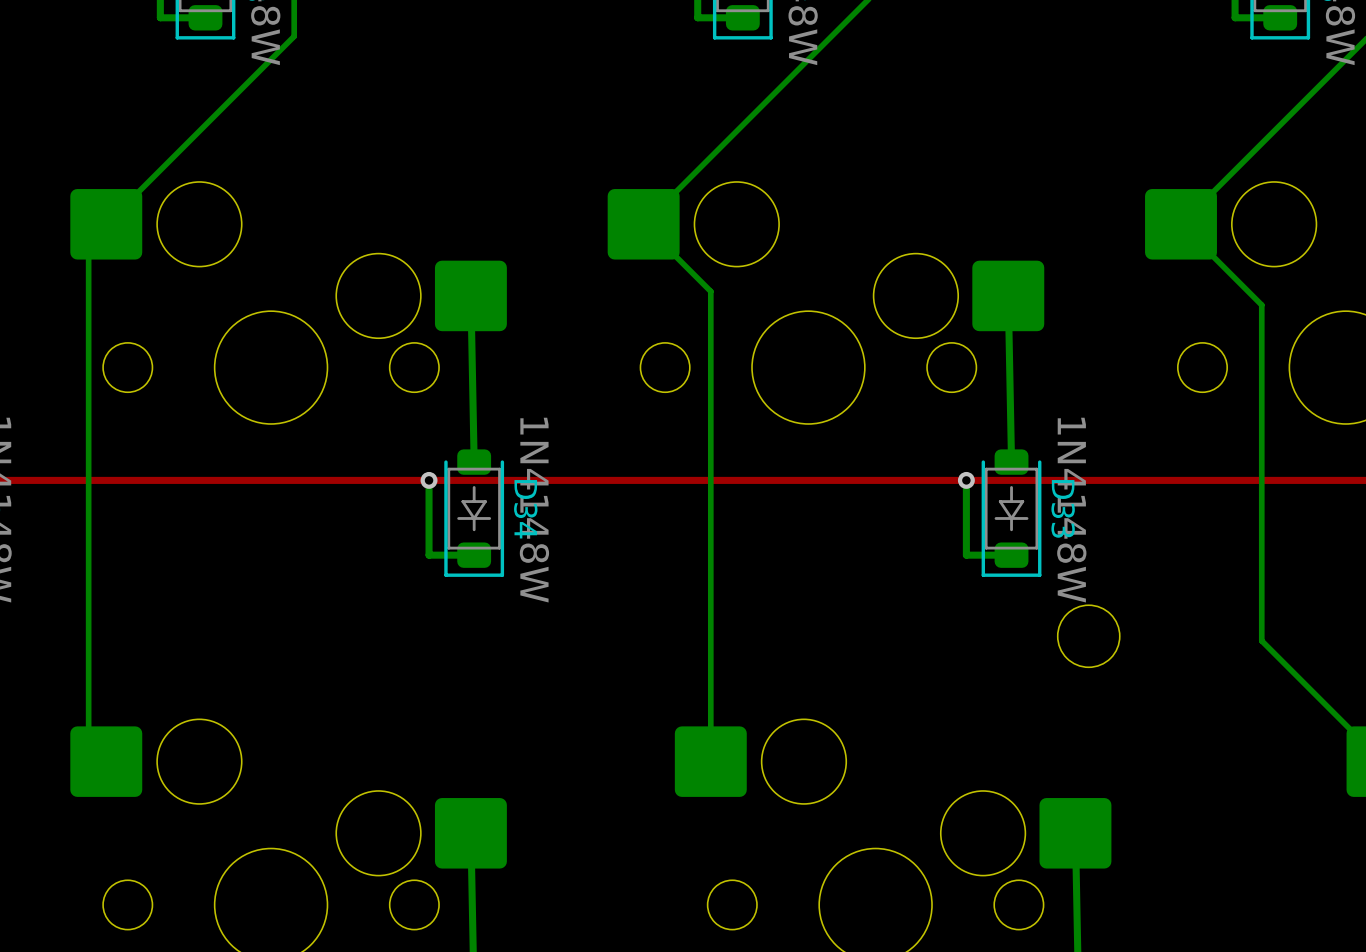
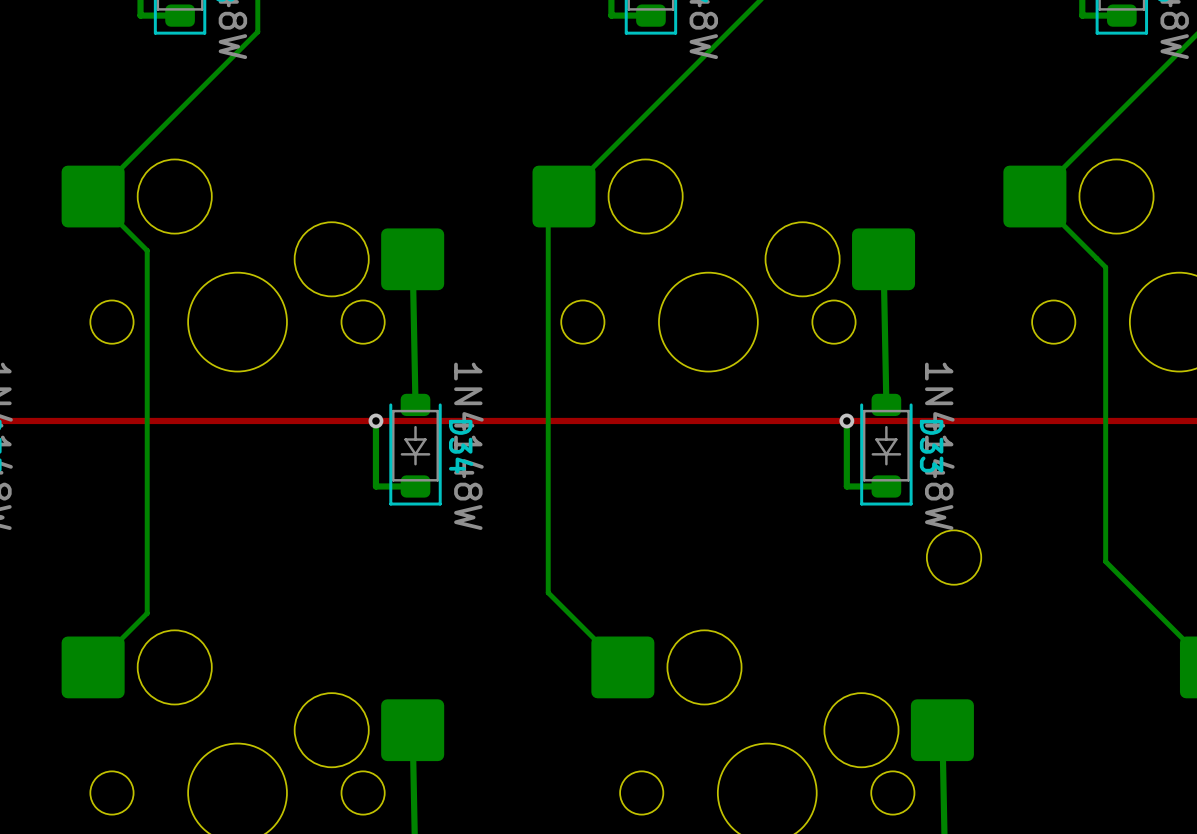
bottom track: (106, 224) (88, 241) (88, 744) (106, 761) -> (93, 196) (147, 250) (147, 613) (93, 667)
bottom track: (643, 224) (710, 291) (710, 761) -> (564, 196) (548, 212) (548, 592) (622, 667)

